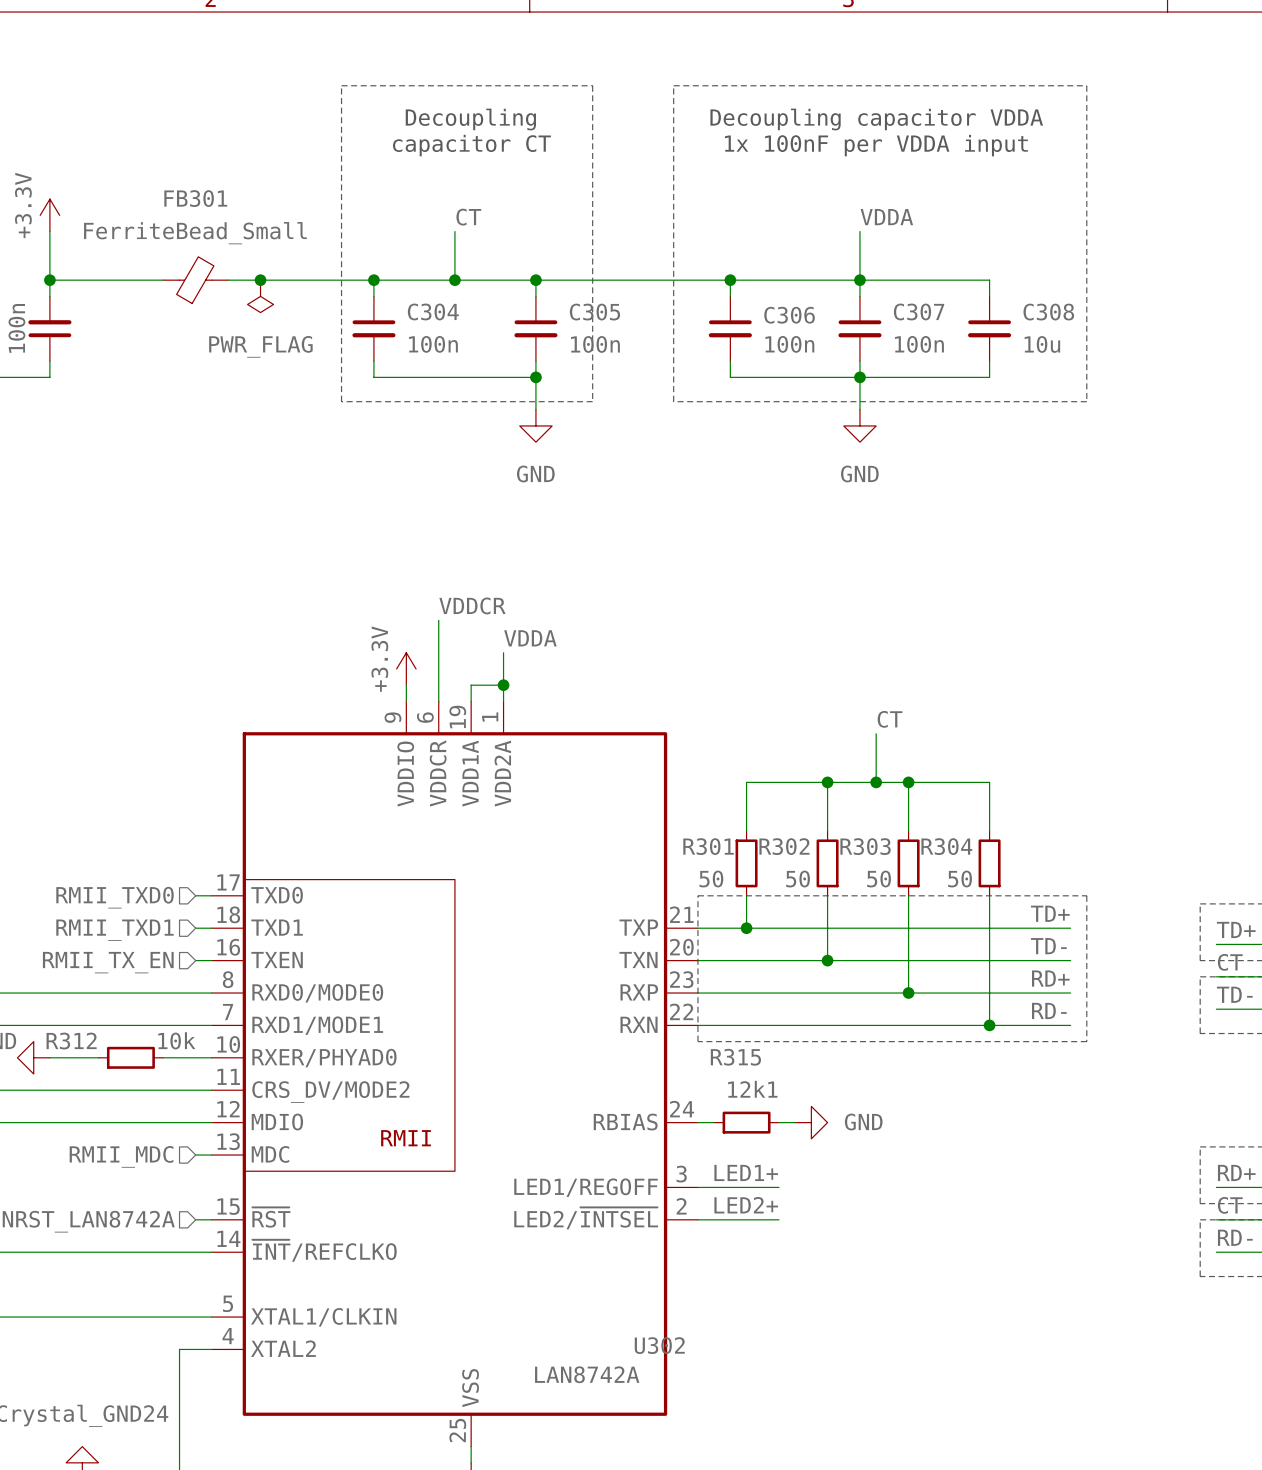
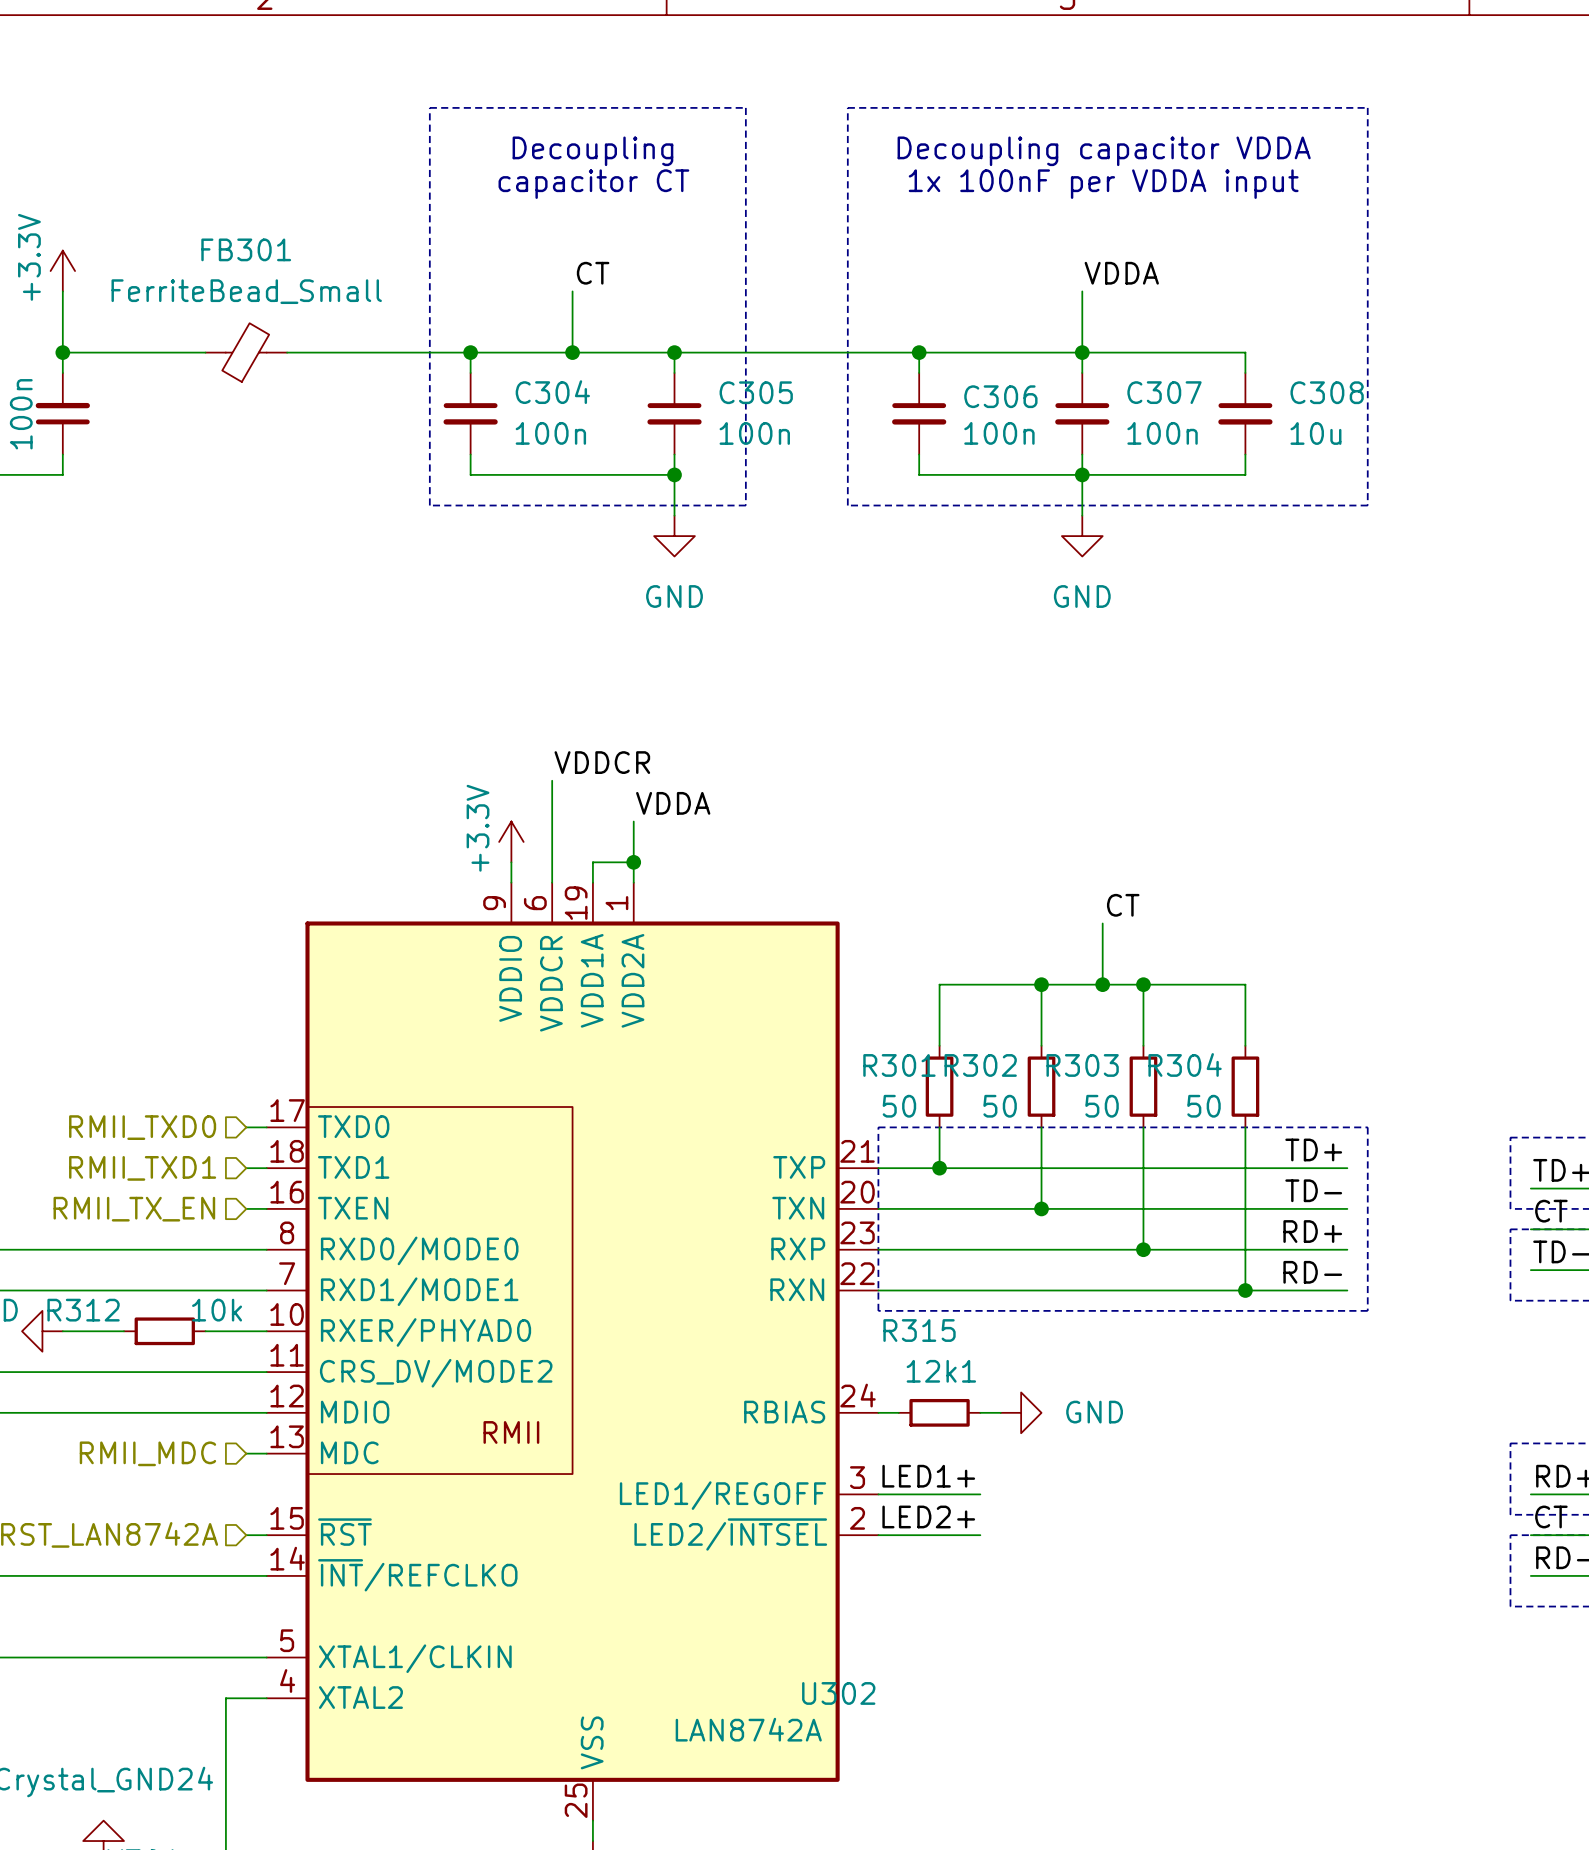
junction: (260, 280) -> none
power symbol: PWR_FLAG (260, 296) -> none

